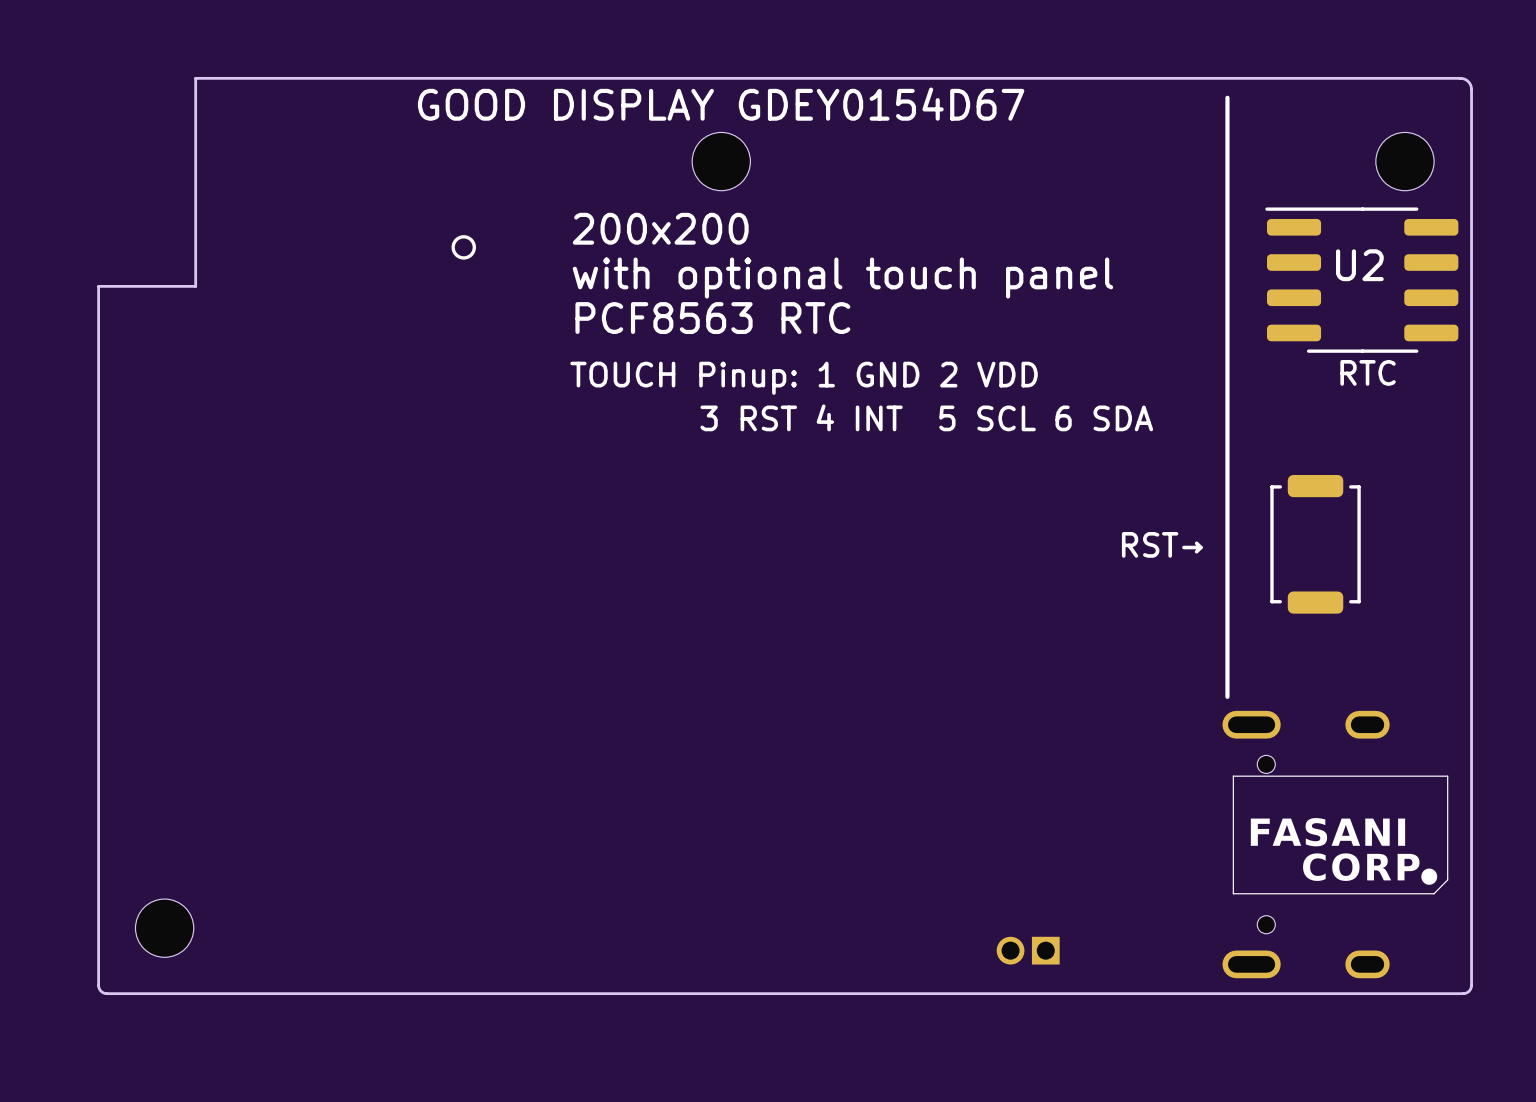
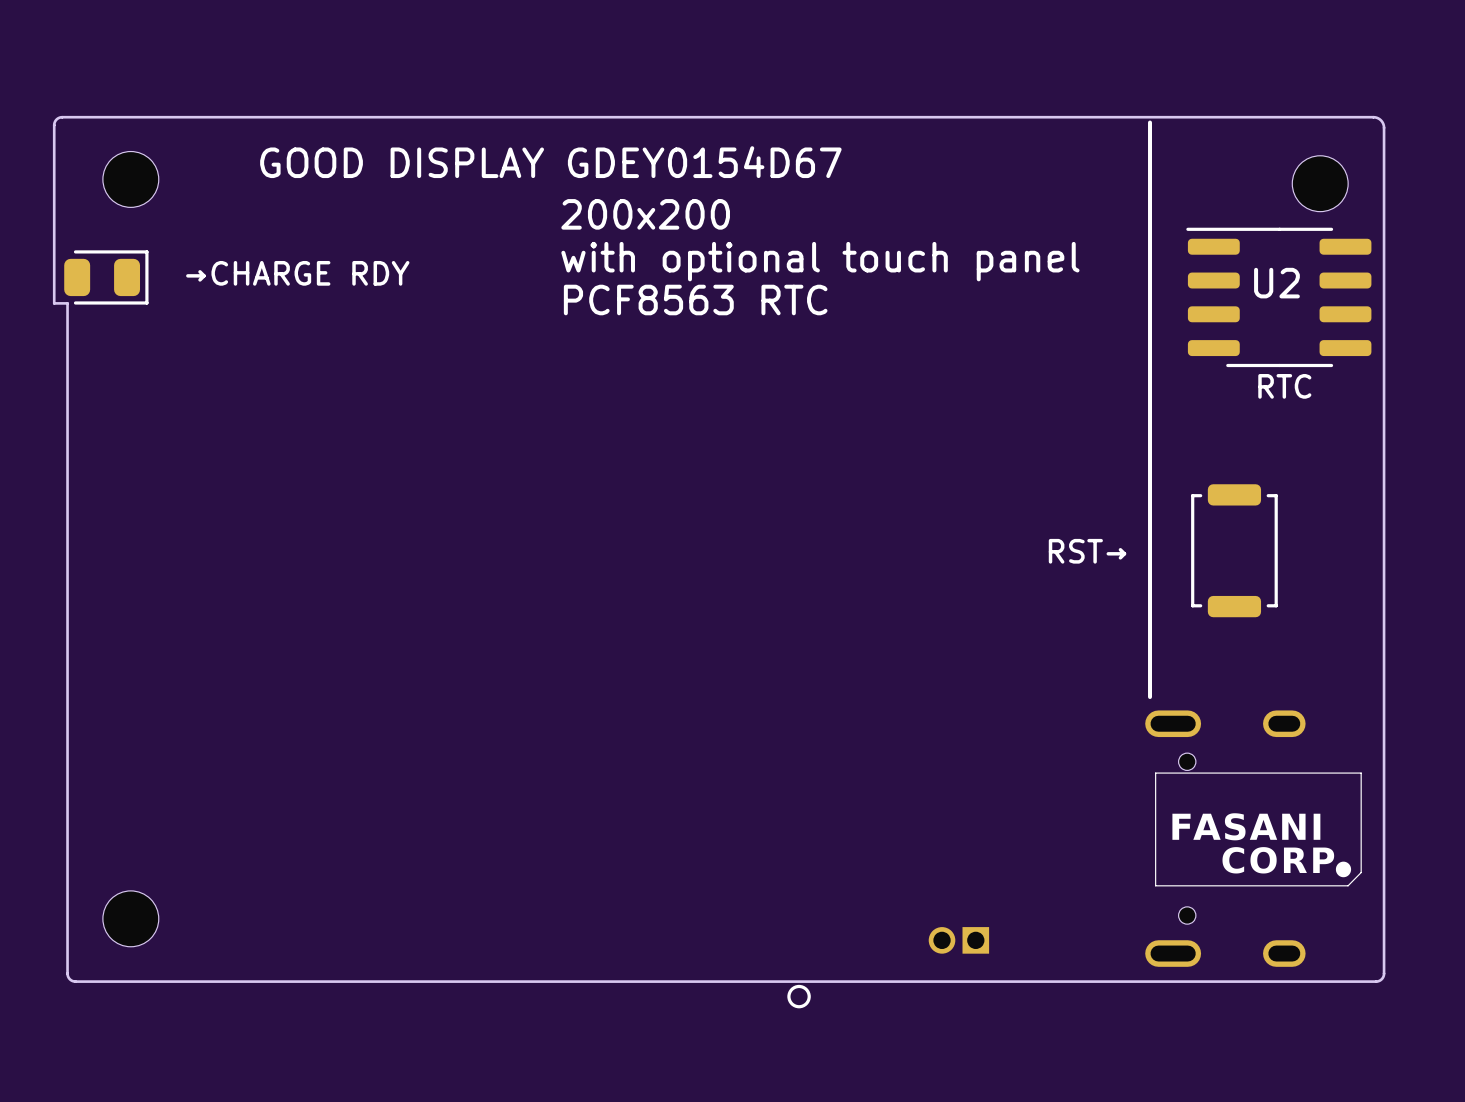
board edge: (1471, 103) (1470, 85) (1465, 79) (1460, 78) (195, 78) (195, 286) (98, 286) -> (1384, 127) (1380, 120) (1373, 117) (61, 117) (55, 120) (54, 125) (54, 303) (67, 303)
text position: GOOD DISPLAY GDEY0154D67 (721, 104) -> GOOD DISPLAY GDEY0154D67 (550, 162)
part position: (721, 161) -> (130, 179)
text position: 200x200 (660, 228) -> 200x200 (645, 214)
part: (463, 247) -> none
text: none -> →CHARGE RDY (297, 273)
part: none -> (106, 277)
text position: with optional touch panel (842, 278) -> with optional touch panel (820, 261)
text position: PCF8563 RTC (712, 318) -> PCF8563 RTC (695, 300)
text: TOUCH Pinup: 1 GND 2 VDD (804, 378) -> none
text: 3 RST 4 INT 5 SCL 6 SDA (926, 417) -> none
part: none -> (799, 996)

